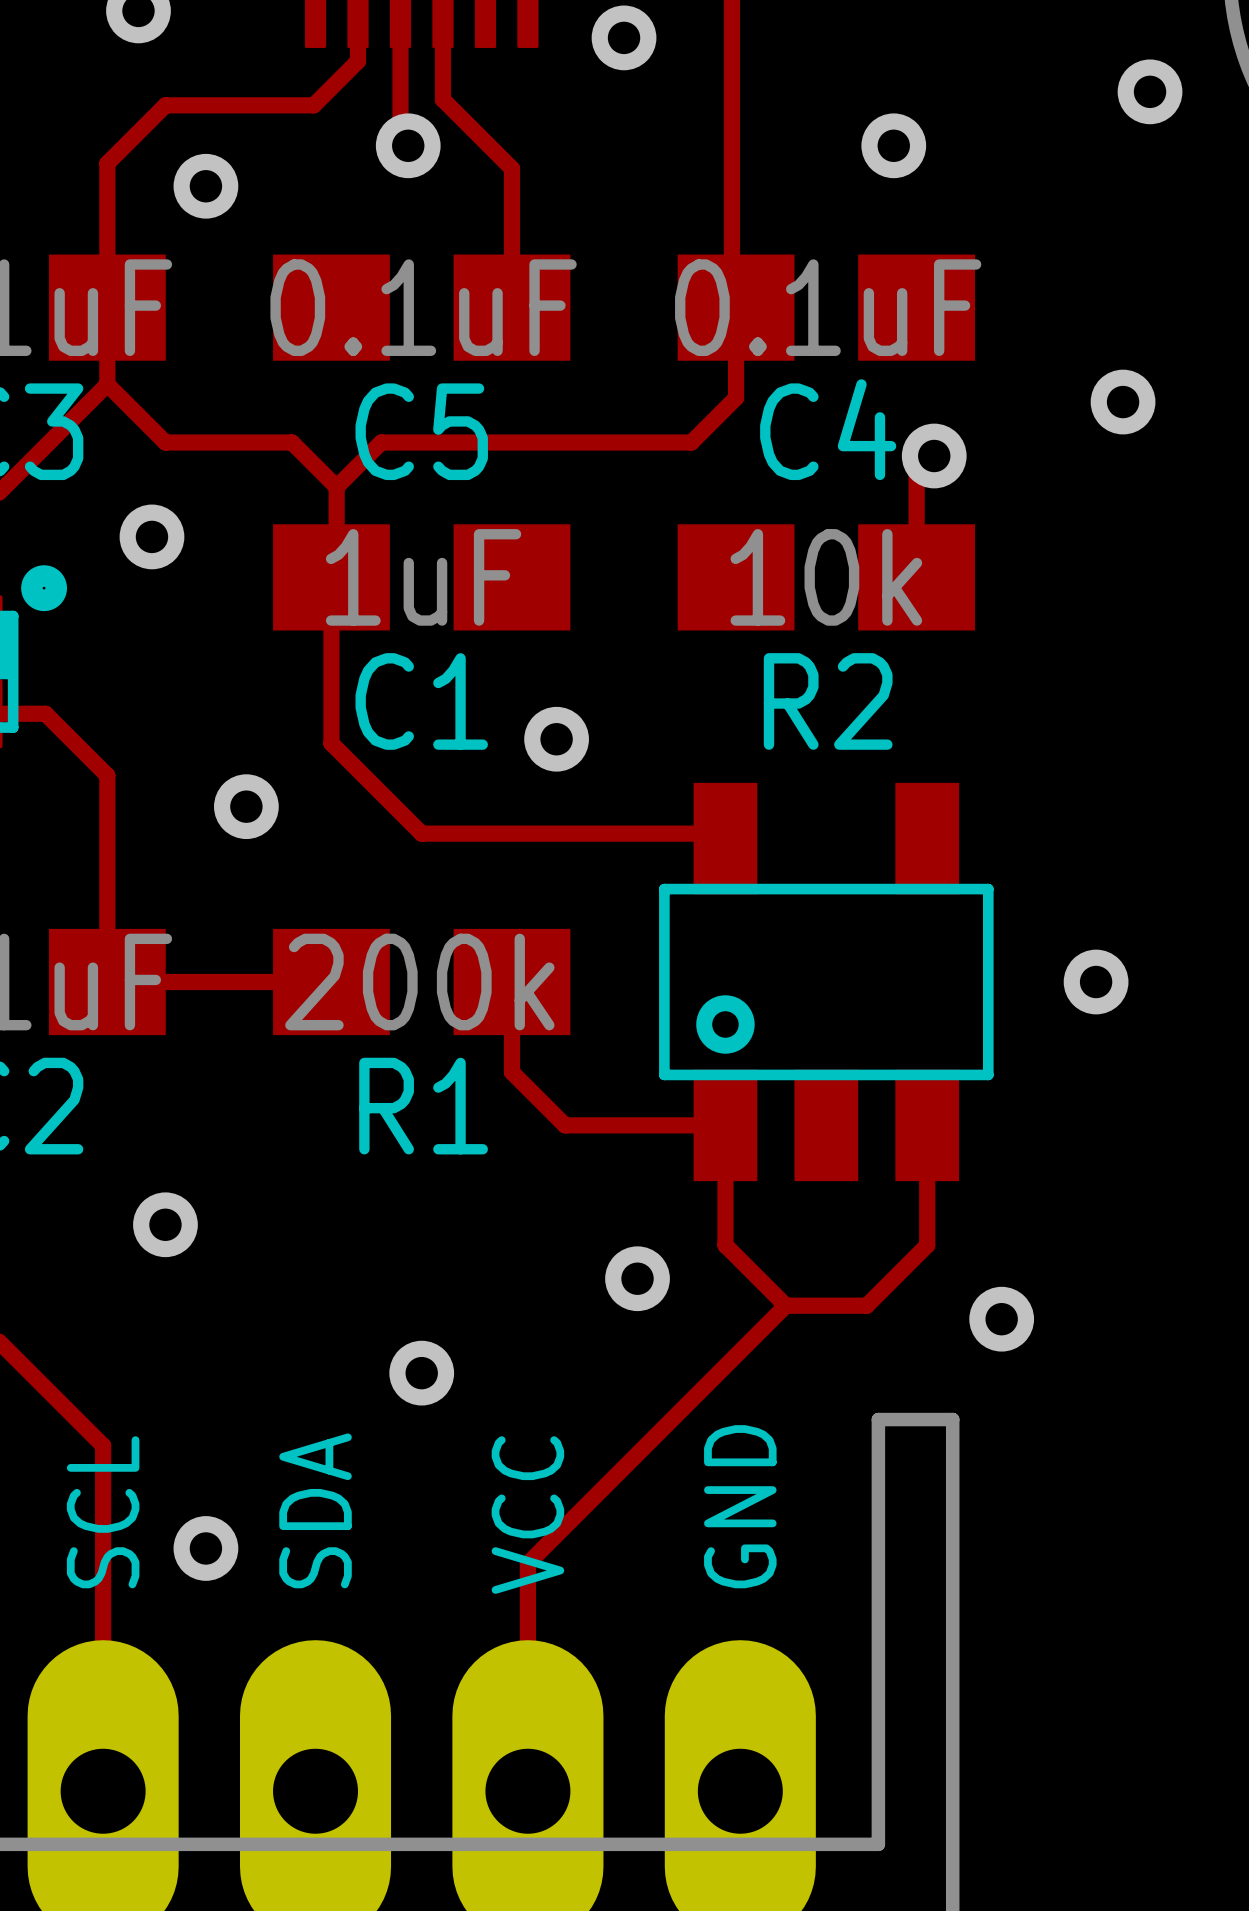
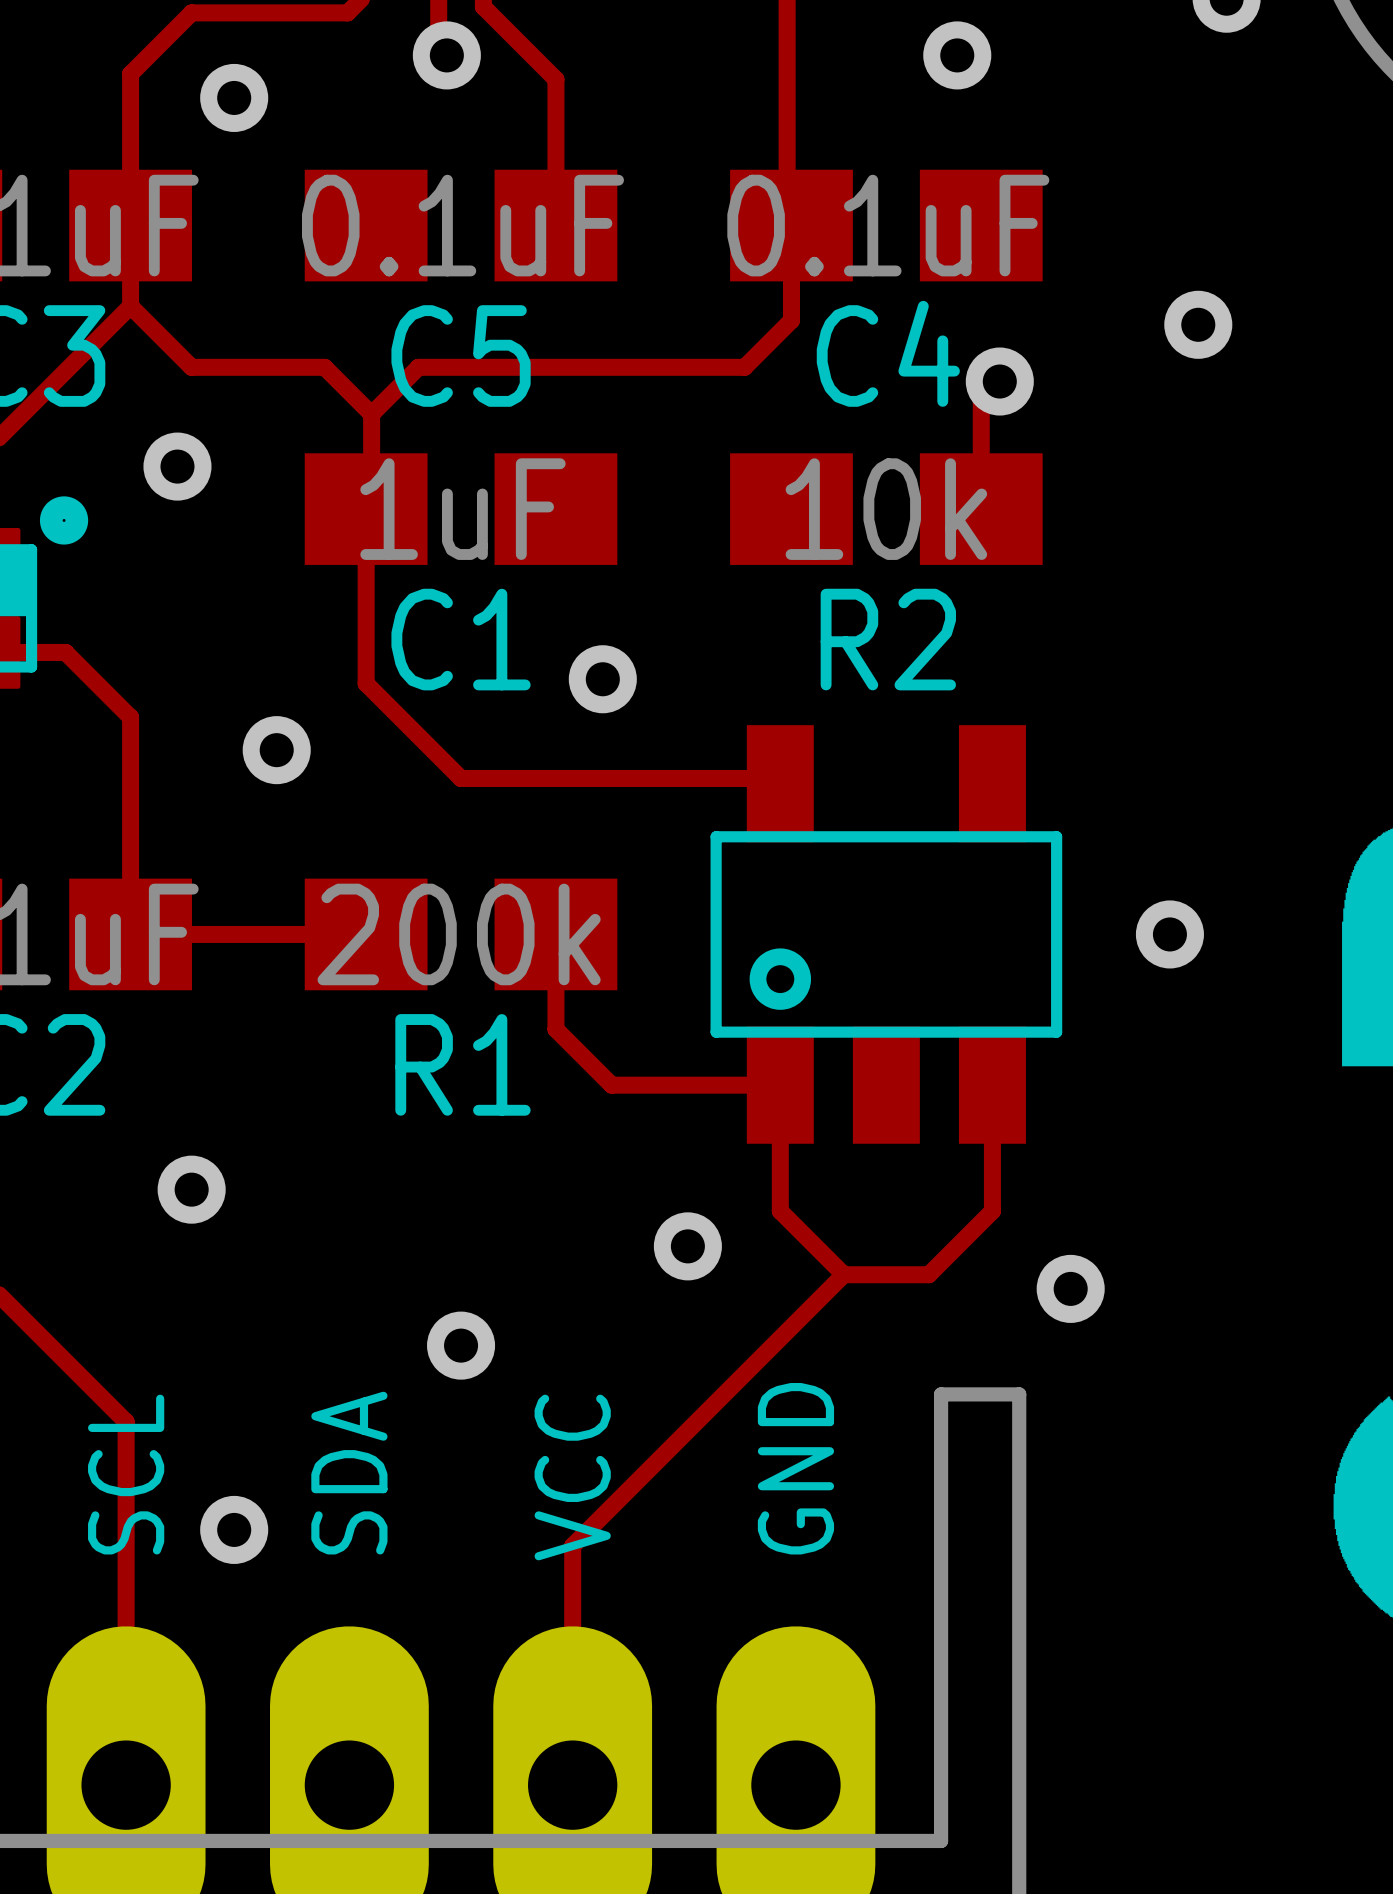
part text position: GND (740, 1506) -> GND (795, 1468)
part text position: SDA (315, 1510) -> SDA (349, 1473)
part text position: SCL (103, 1512) -> SCL (126, 1474)
part text position: VCC (527, 1515) -> VCC (572, 1477)

